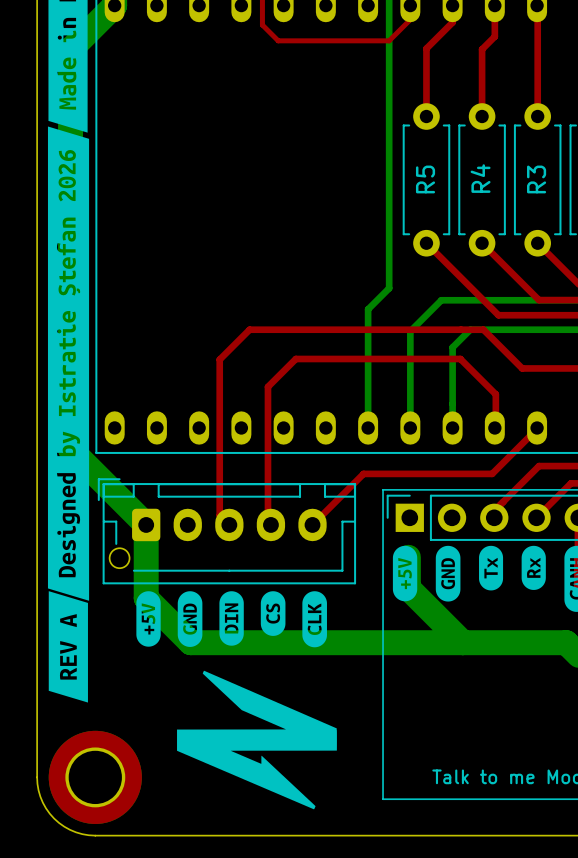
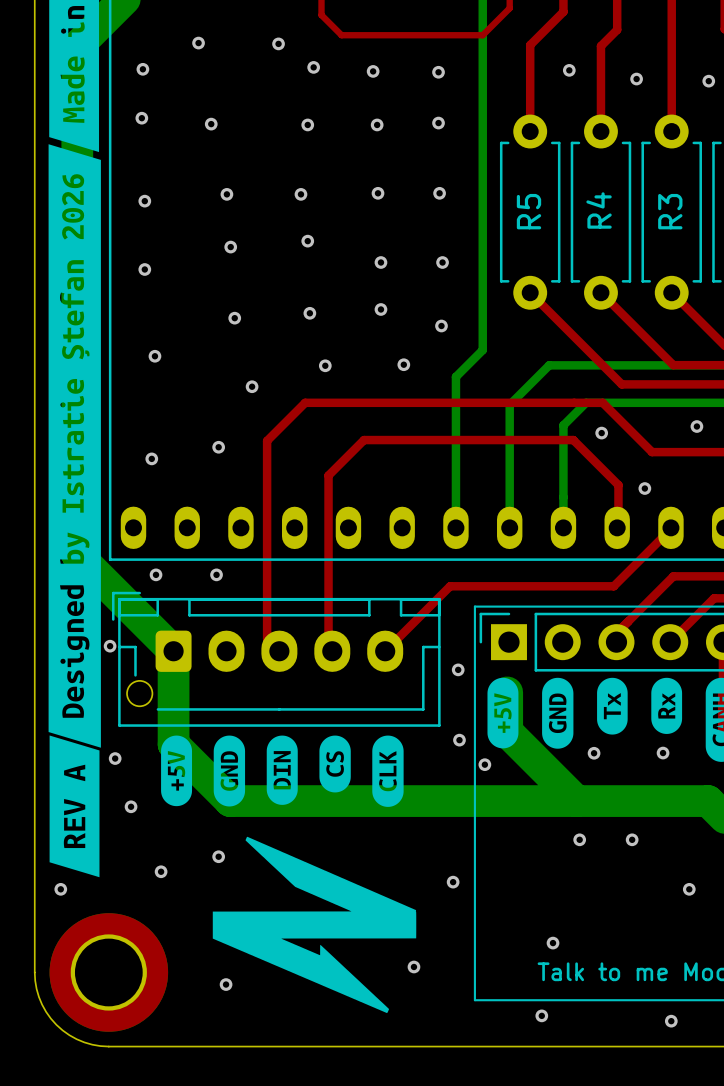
via: none -> (198, 43)
via: none -> (278, 43)
via: none -> (313, 67)
via: none -> (142, 69)
via: none -> (569, 70)
via: none -> (373, 71)
via: none -> (438, 72)
via: none -> (636, 79)
via: none -> (708, 81)
via: none -> (141, 118)
via: none -> (438, 123)
via: none -> (211, 124)
via: none -> (307, 124)
via: none -> (377, 124)
via: none -> (226, 194)
via: none -> (300, 194)
via: none -> (378, 193)
via: none -> (439, 193)
via: none -> (144, 201)
via: none -> (307, 241)
via: none -> (230, 247)
via: none -> (380, 262)
via: none -> (442, 262)
via: none -> (144, 269)
via: none -> (380, 309)
via: none -> (309, 313)
via: none -> (234, 318)
via: none -> (441, 325)
via: none -> (154, 356)
via: none -> (403, 364)
via: none -> (325, 365)
via: none -> (252, 386)
via: none -> (696, 426)
via: none -> (601, 433)
via: none -> (218, 447)
via: none -> (151, 458)
via: none -> (644, 488)
via: none -> (156, 574)
via: none -> (216, 574)
via: none -> (110, 646)
via: none -> (458, 669)
via: none -> (459, 740)
via: none -> (663, 753)
via: none -> (594, 753)
via: none -> (115, 758)
via: none -> (484, 764)
via: none -> (131, 806)
via: none -> (579, 839)
via: none -> (632, 839)
via: none -> (218, 856)
via: none -> (161, 871)
via: none -> (453, 882)
via: none -> (60, 889)
via: none -> (689, 889)
via: none -> (553, 943)
via: none -> (413, 966)
via: none -> (226, 984)
via: none -> (541, 1015)
via: none -> (671, 1021)

